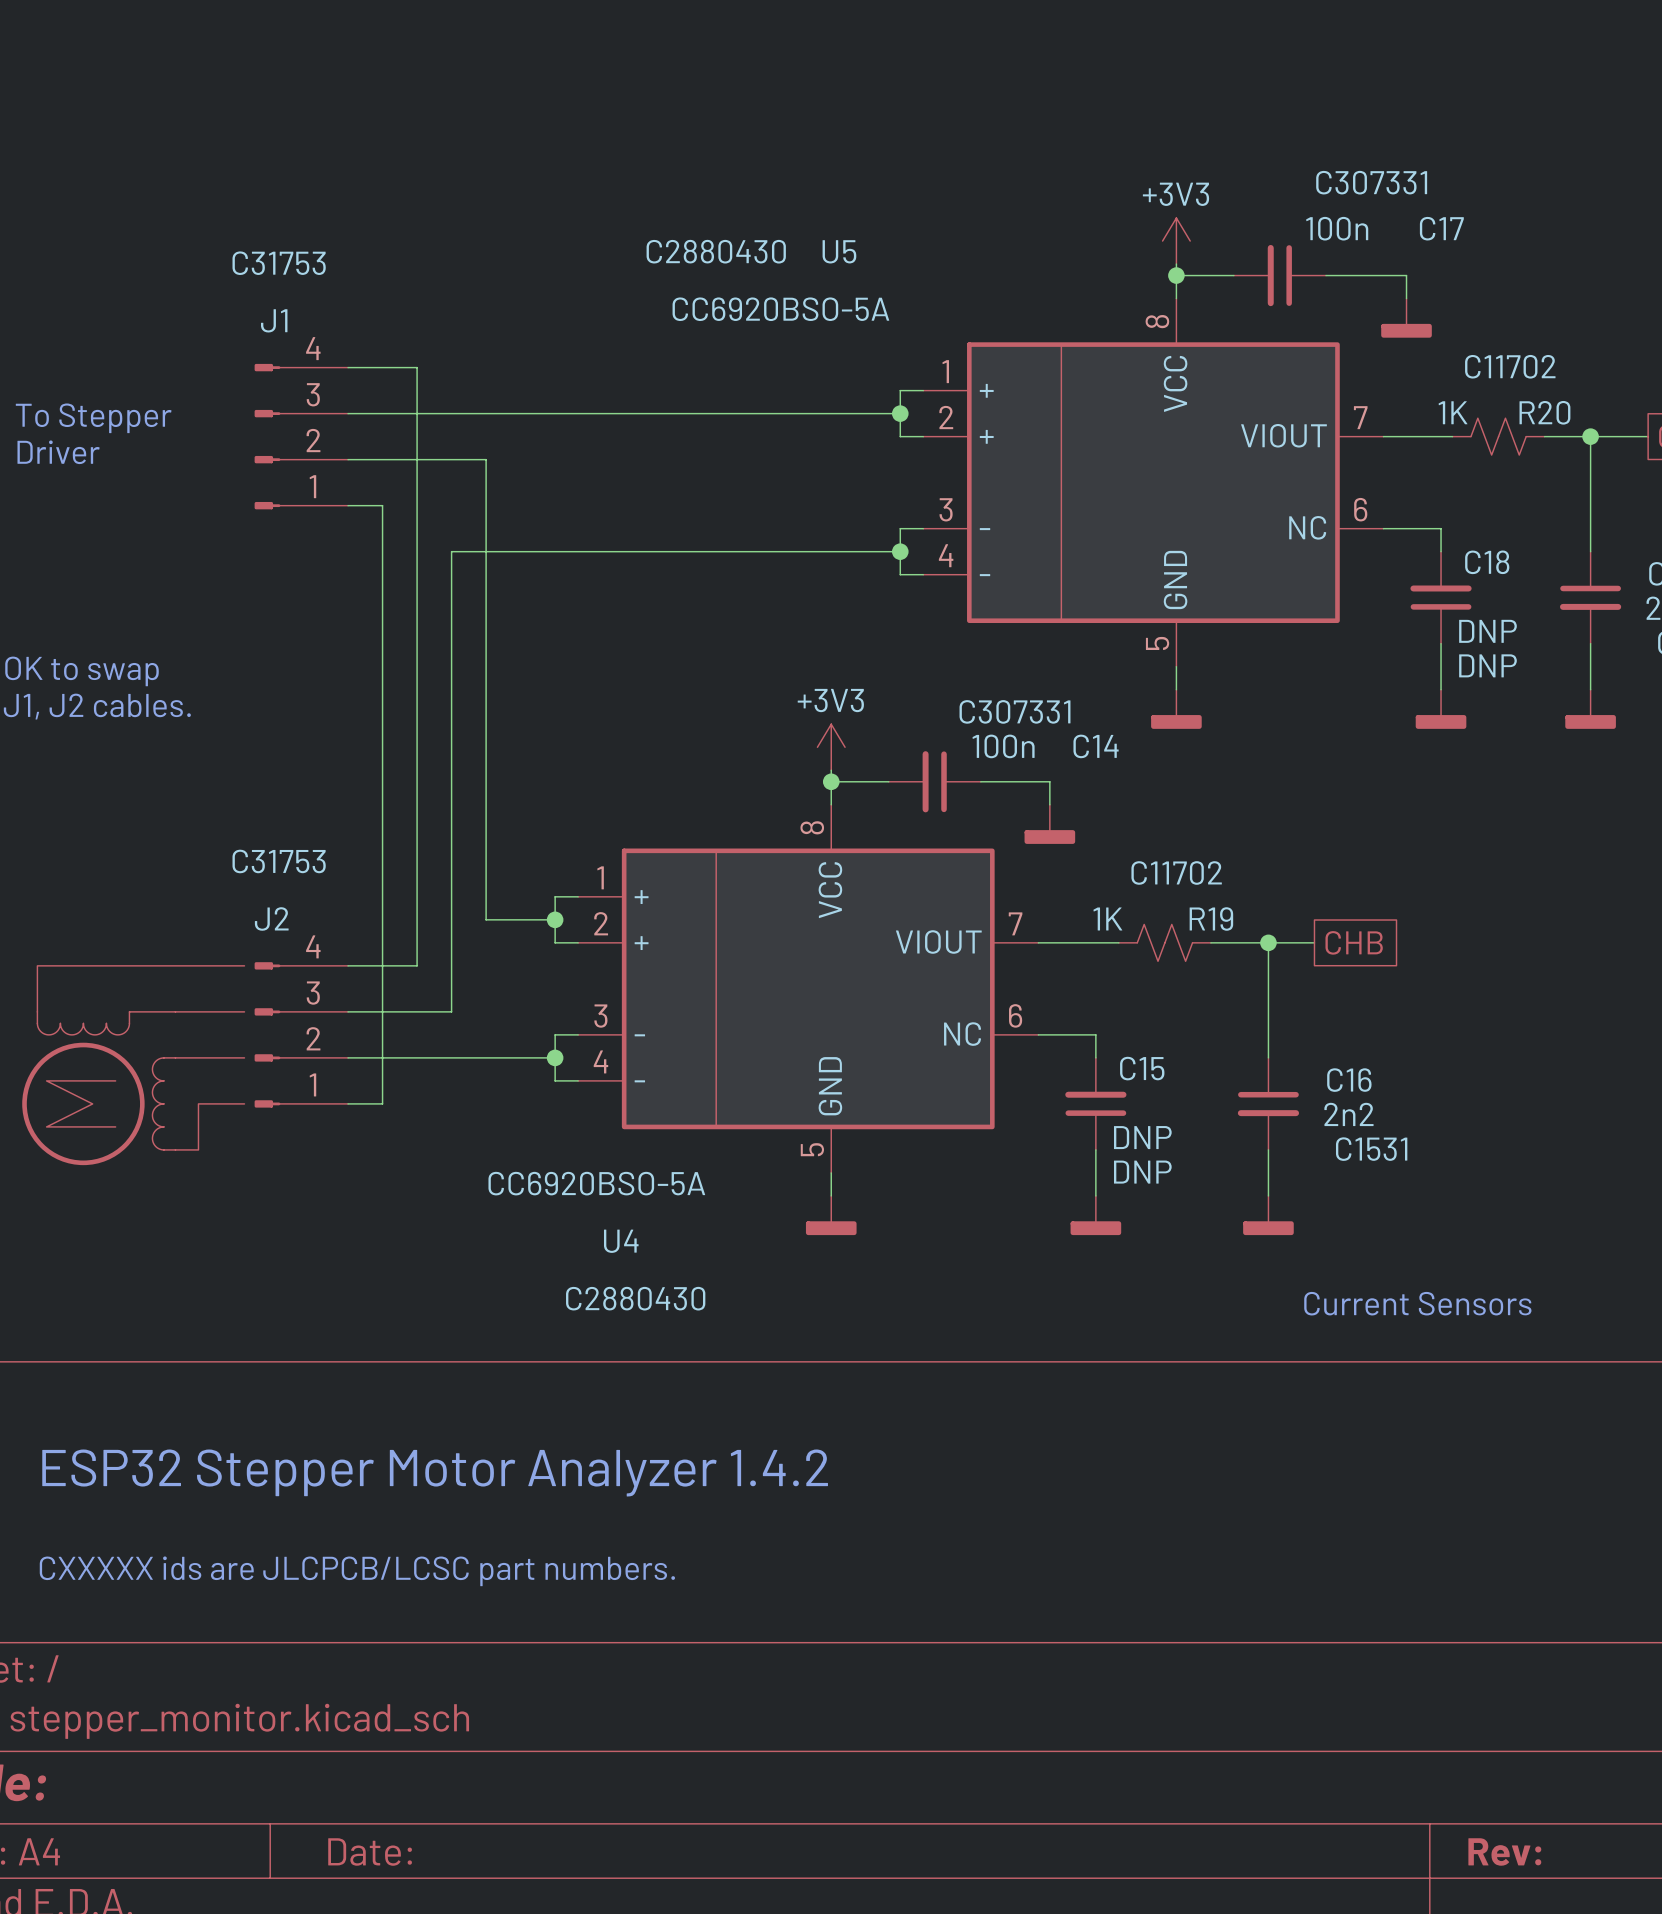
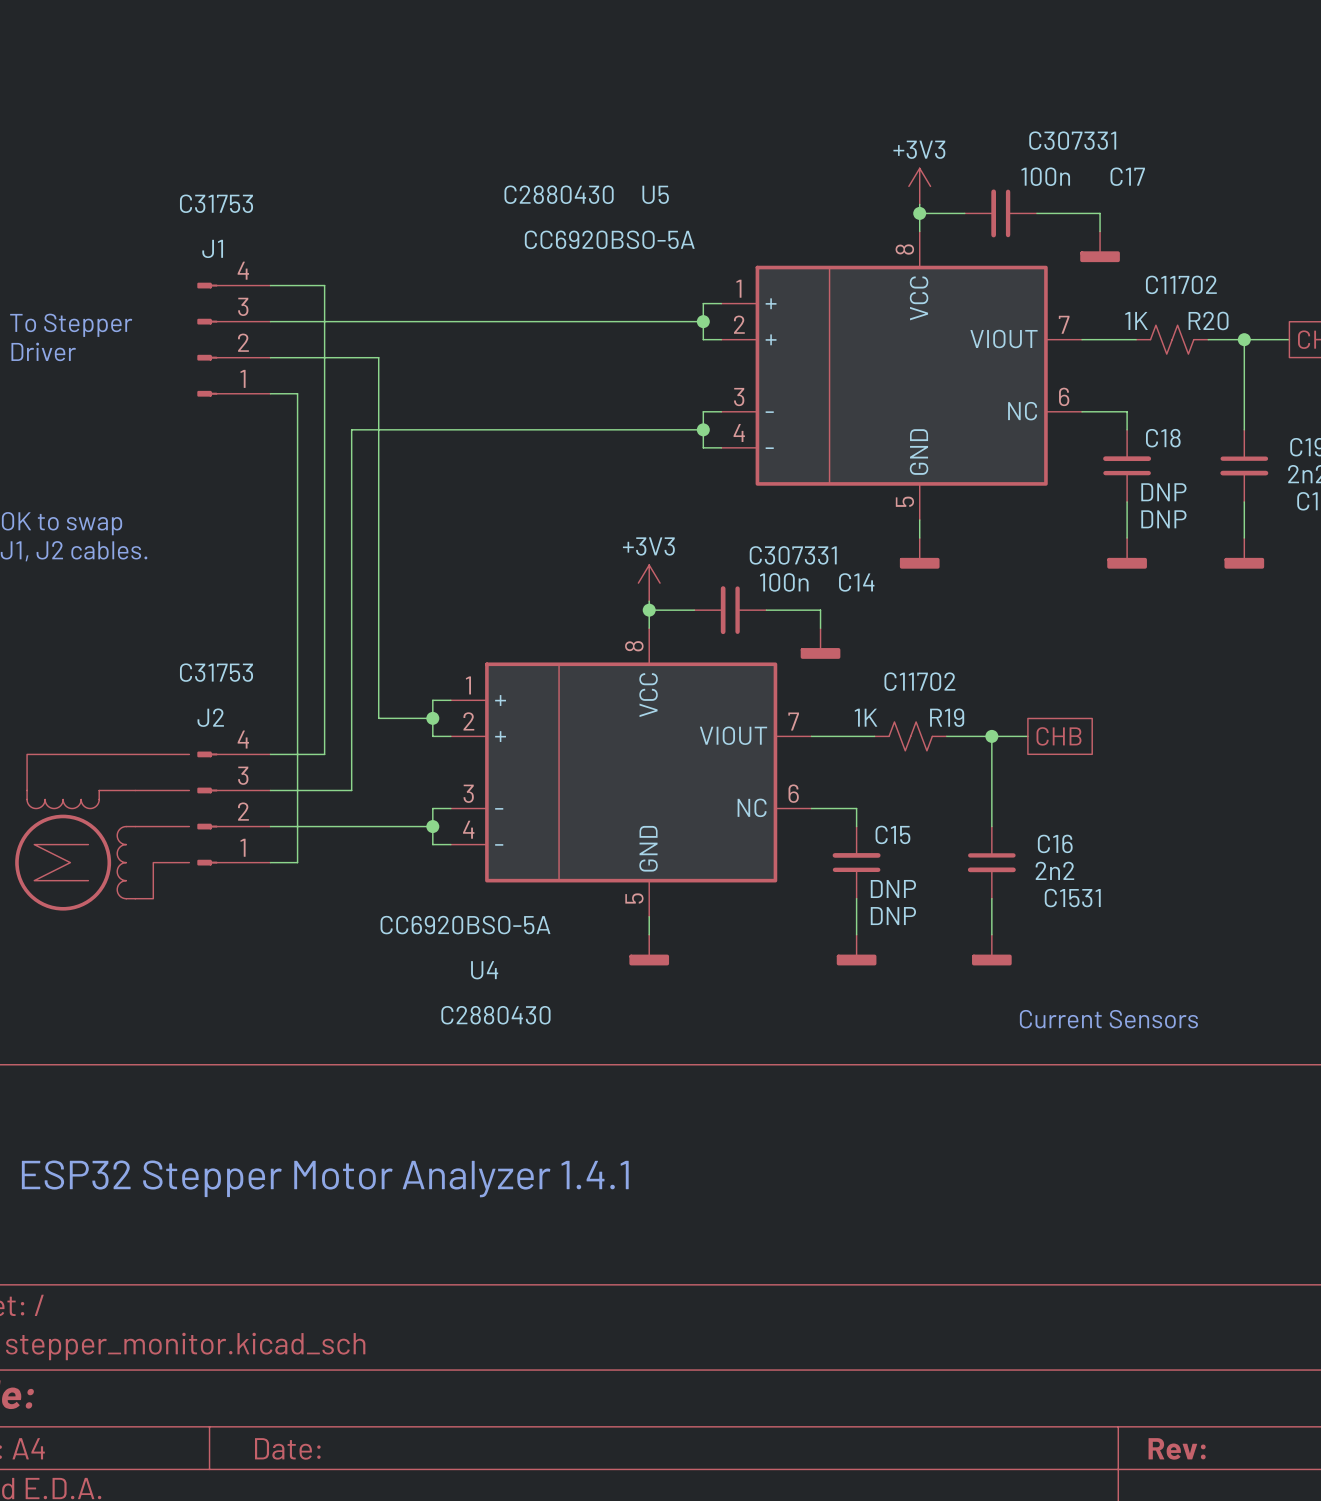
text: ESP32 Stepper Motor Analyzer 1.4.2 (435, 1472) -> ESP32 Stepper Motor Analyzer 1.4.1 (325, 1178)
text: CXXXXX ids are JLCPCB/LCSC part numbers. (357, 1571) -> none

